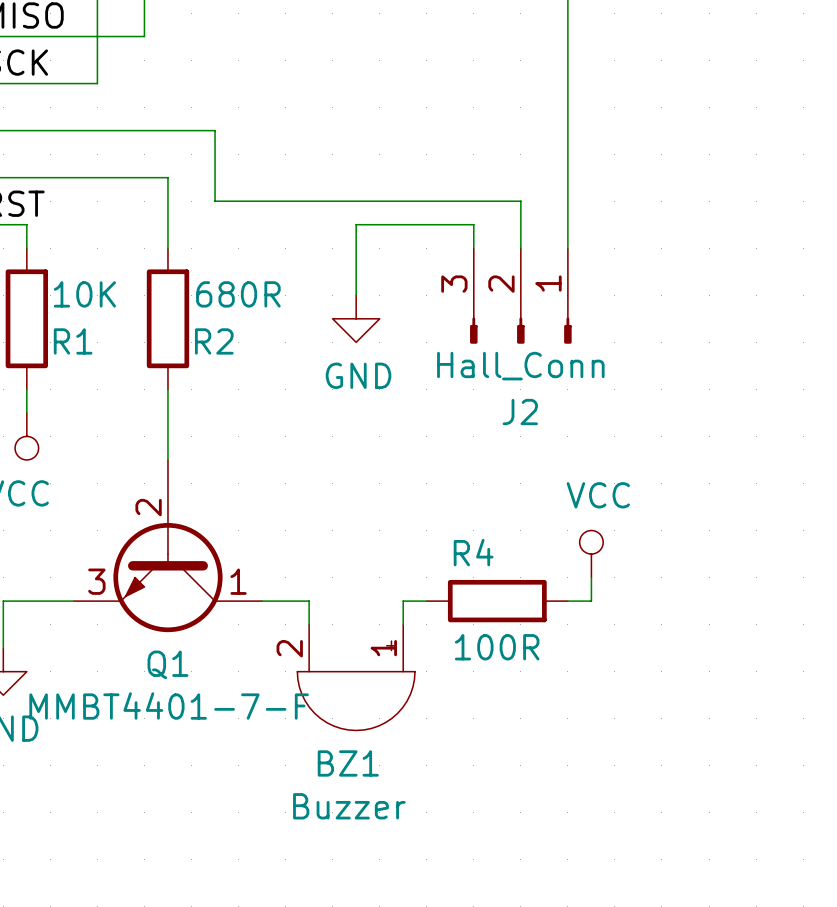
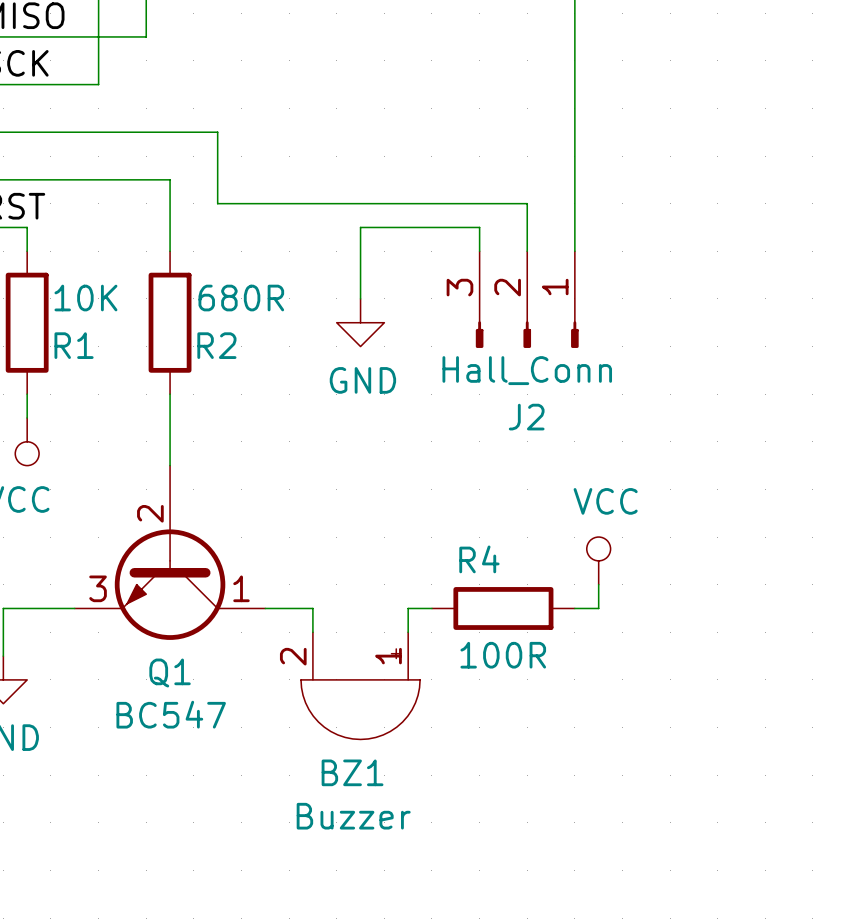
Q1 value: MMBT4401-7-F (169, 705) -> BC547 (171, 714)

